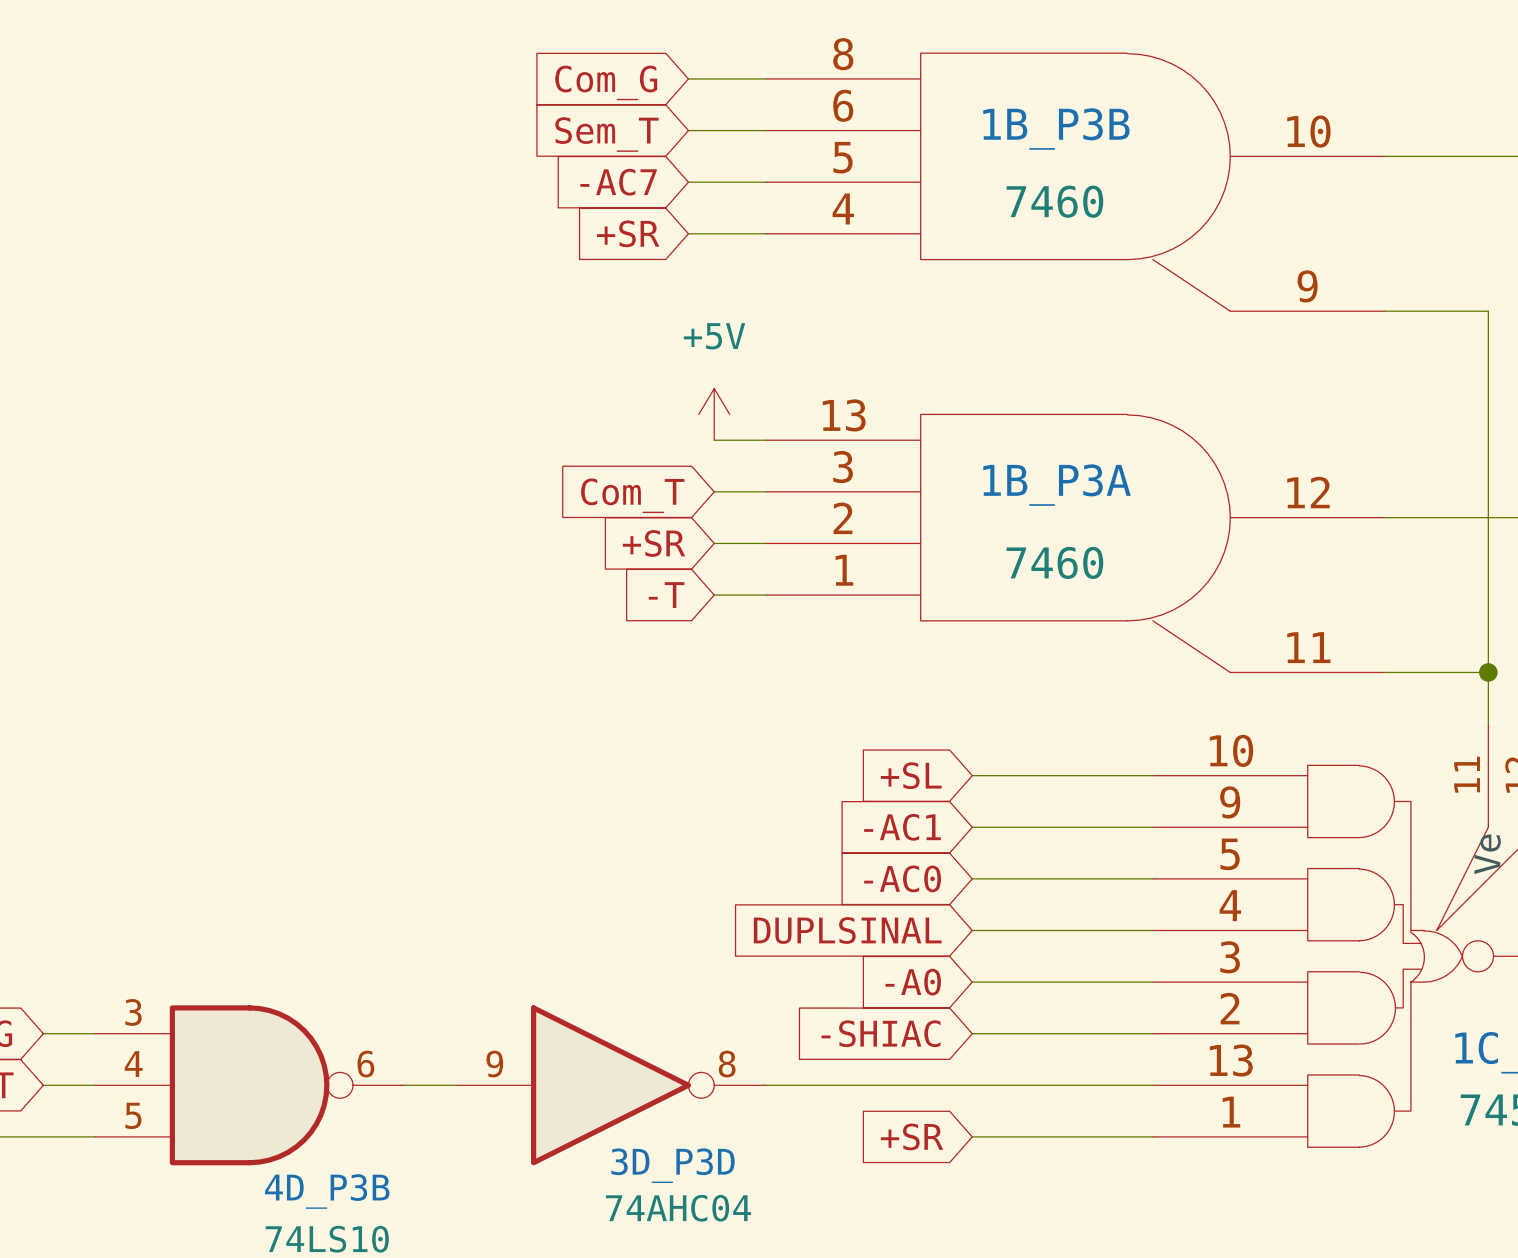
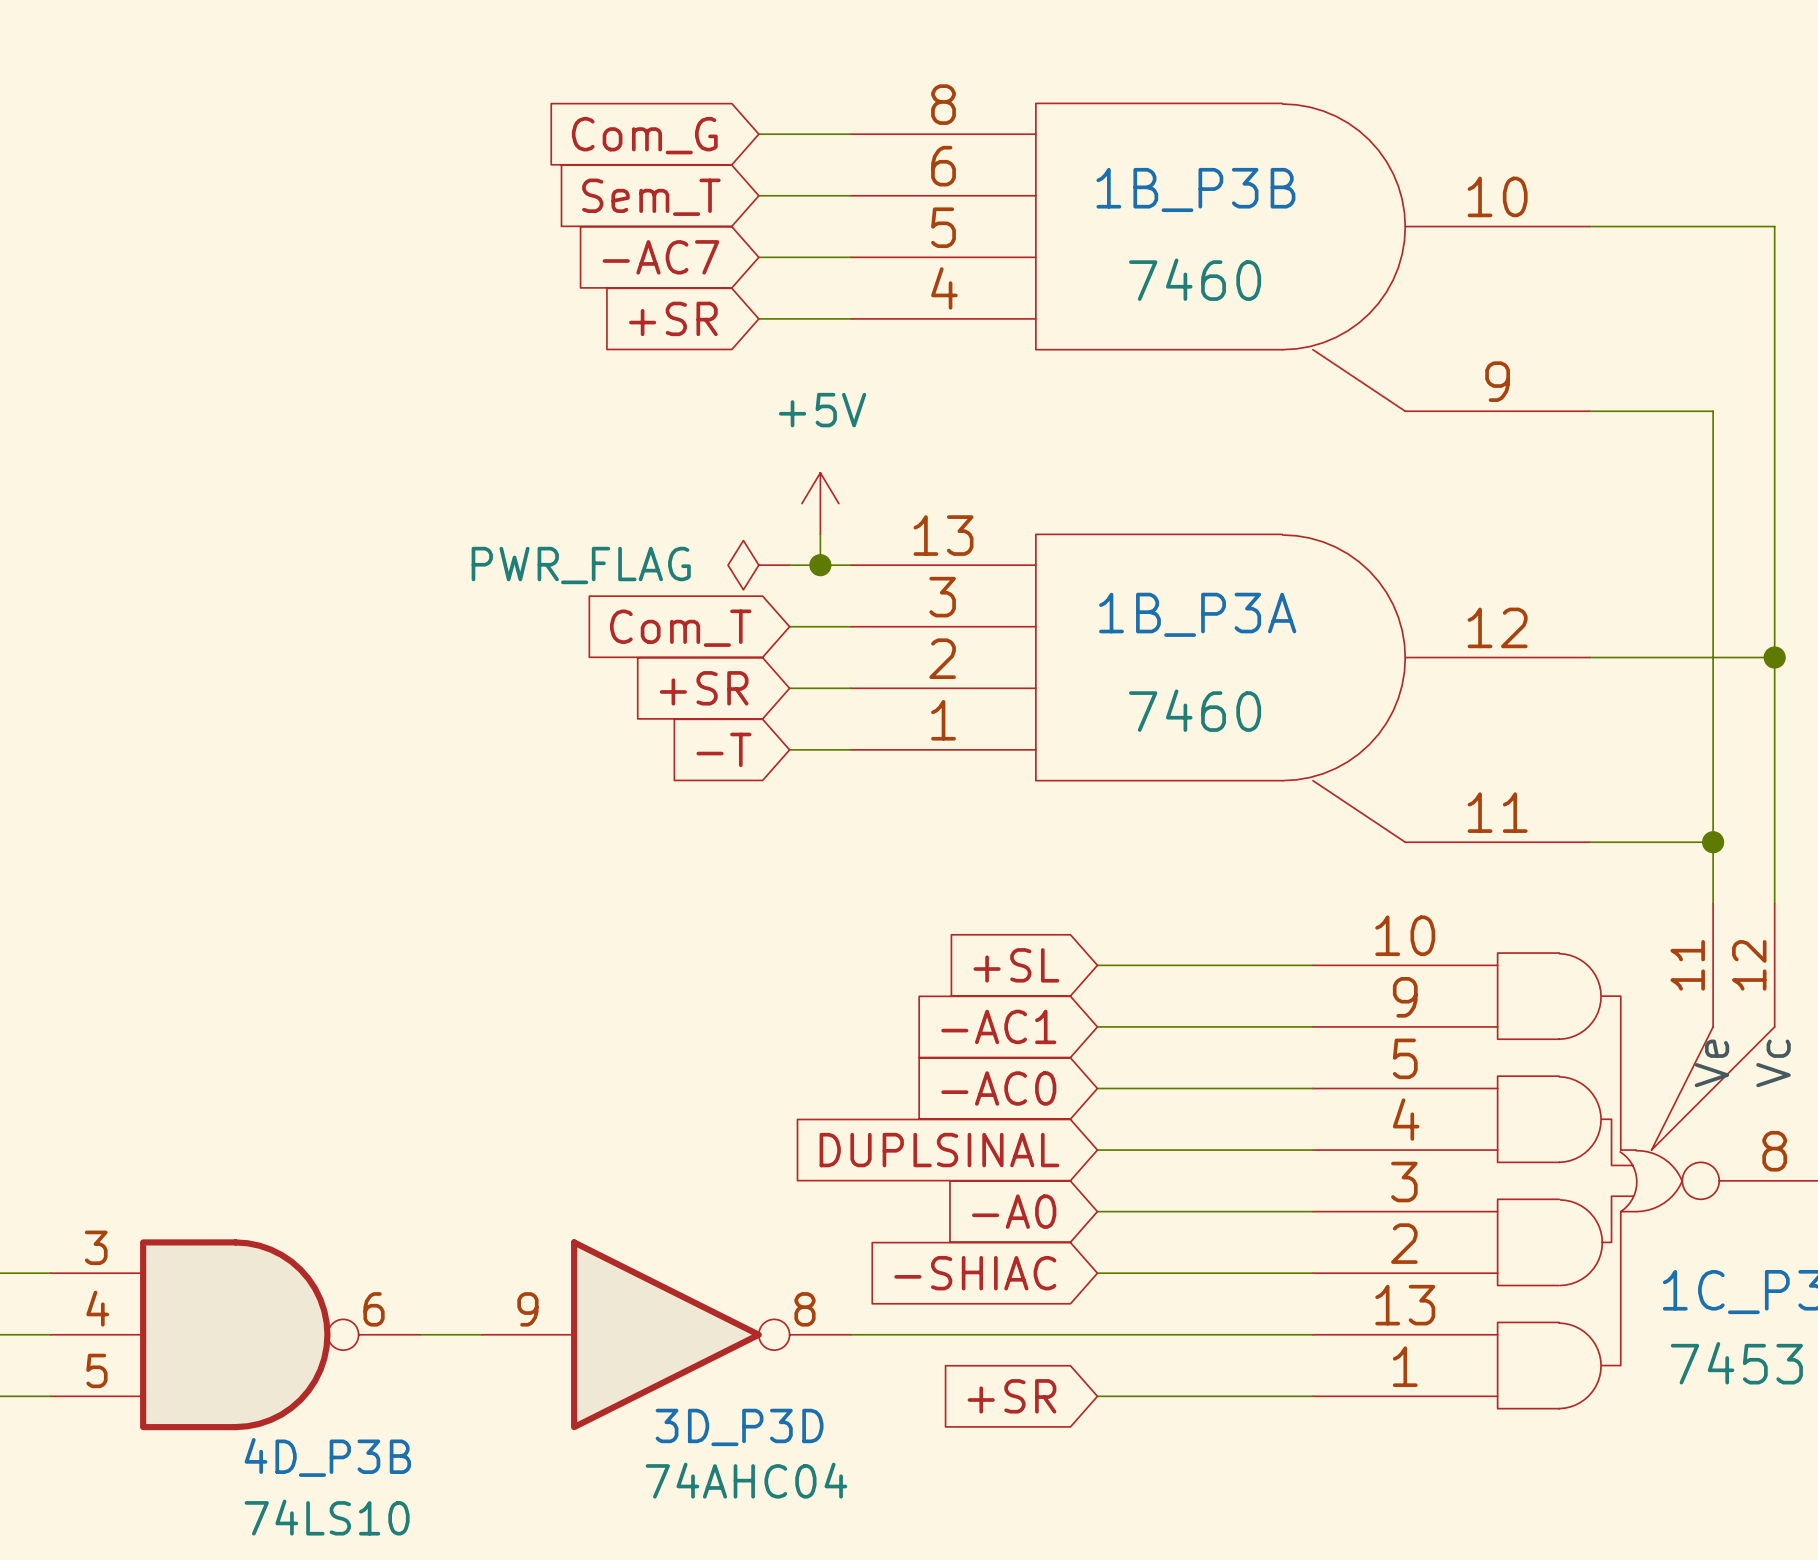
power symbol position: +5V (714, 414) -> +5V (820, 503)
wire: none -> (820, 534) (820, 565)
power symbol: none -> PWR_FLAG (758, 565)
junction: none -> (820, 565)

